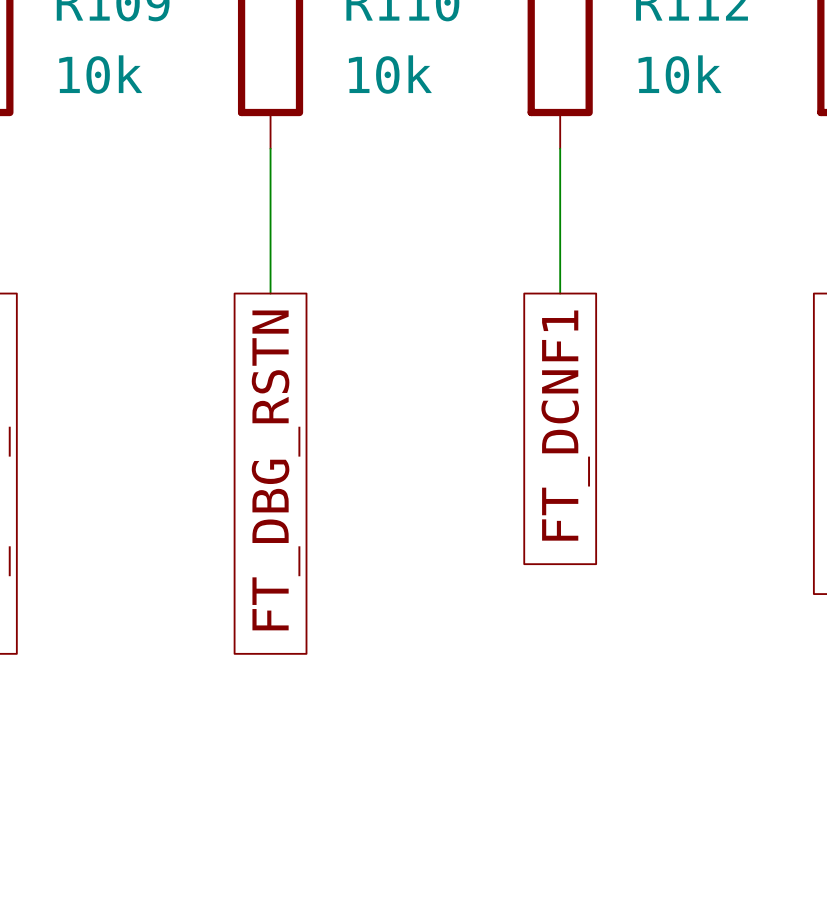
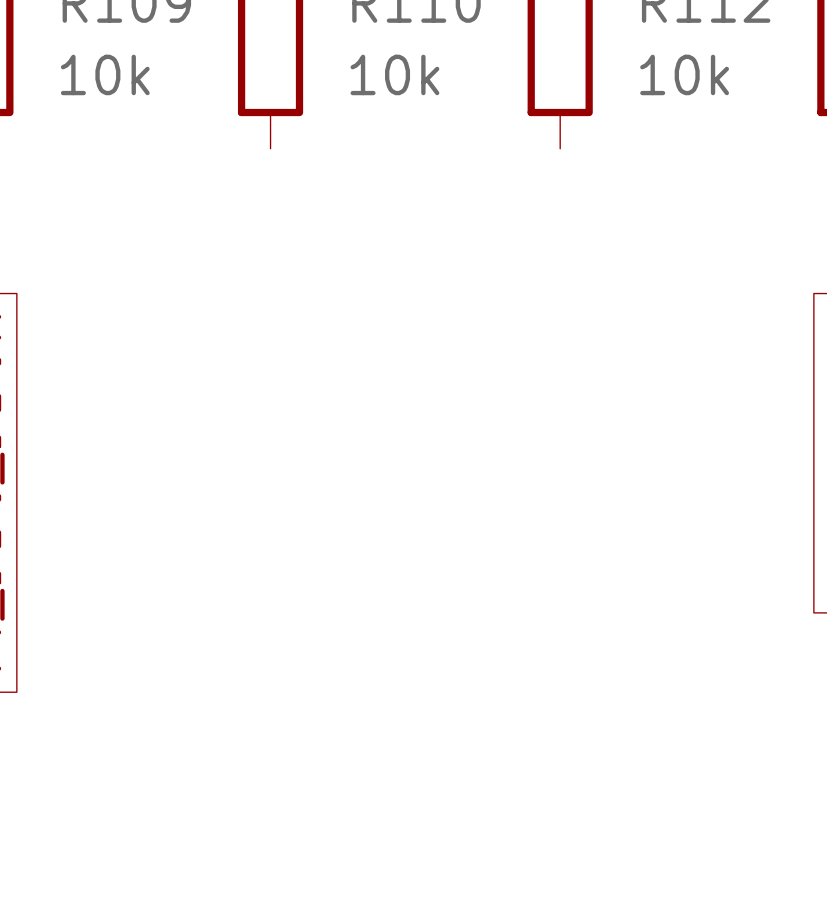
wire: (270, 148) (270, 293) -> none
wire: (560, 148) (560, 293) -> none
global label: FT_DCNF1 (565, 425) -> none
global label: FT_DBG_RSTN (276, 470) -> none

